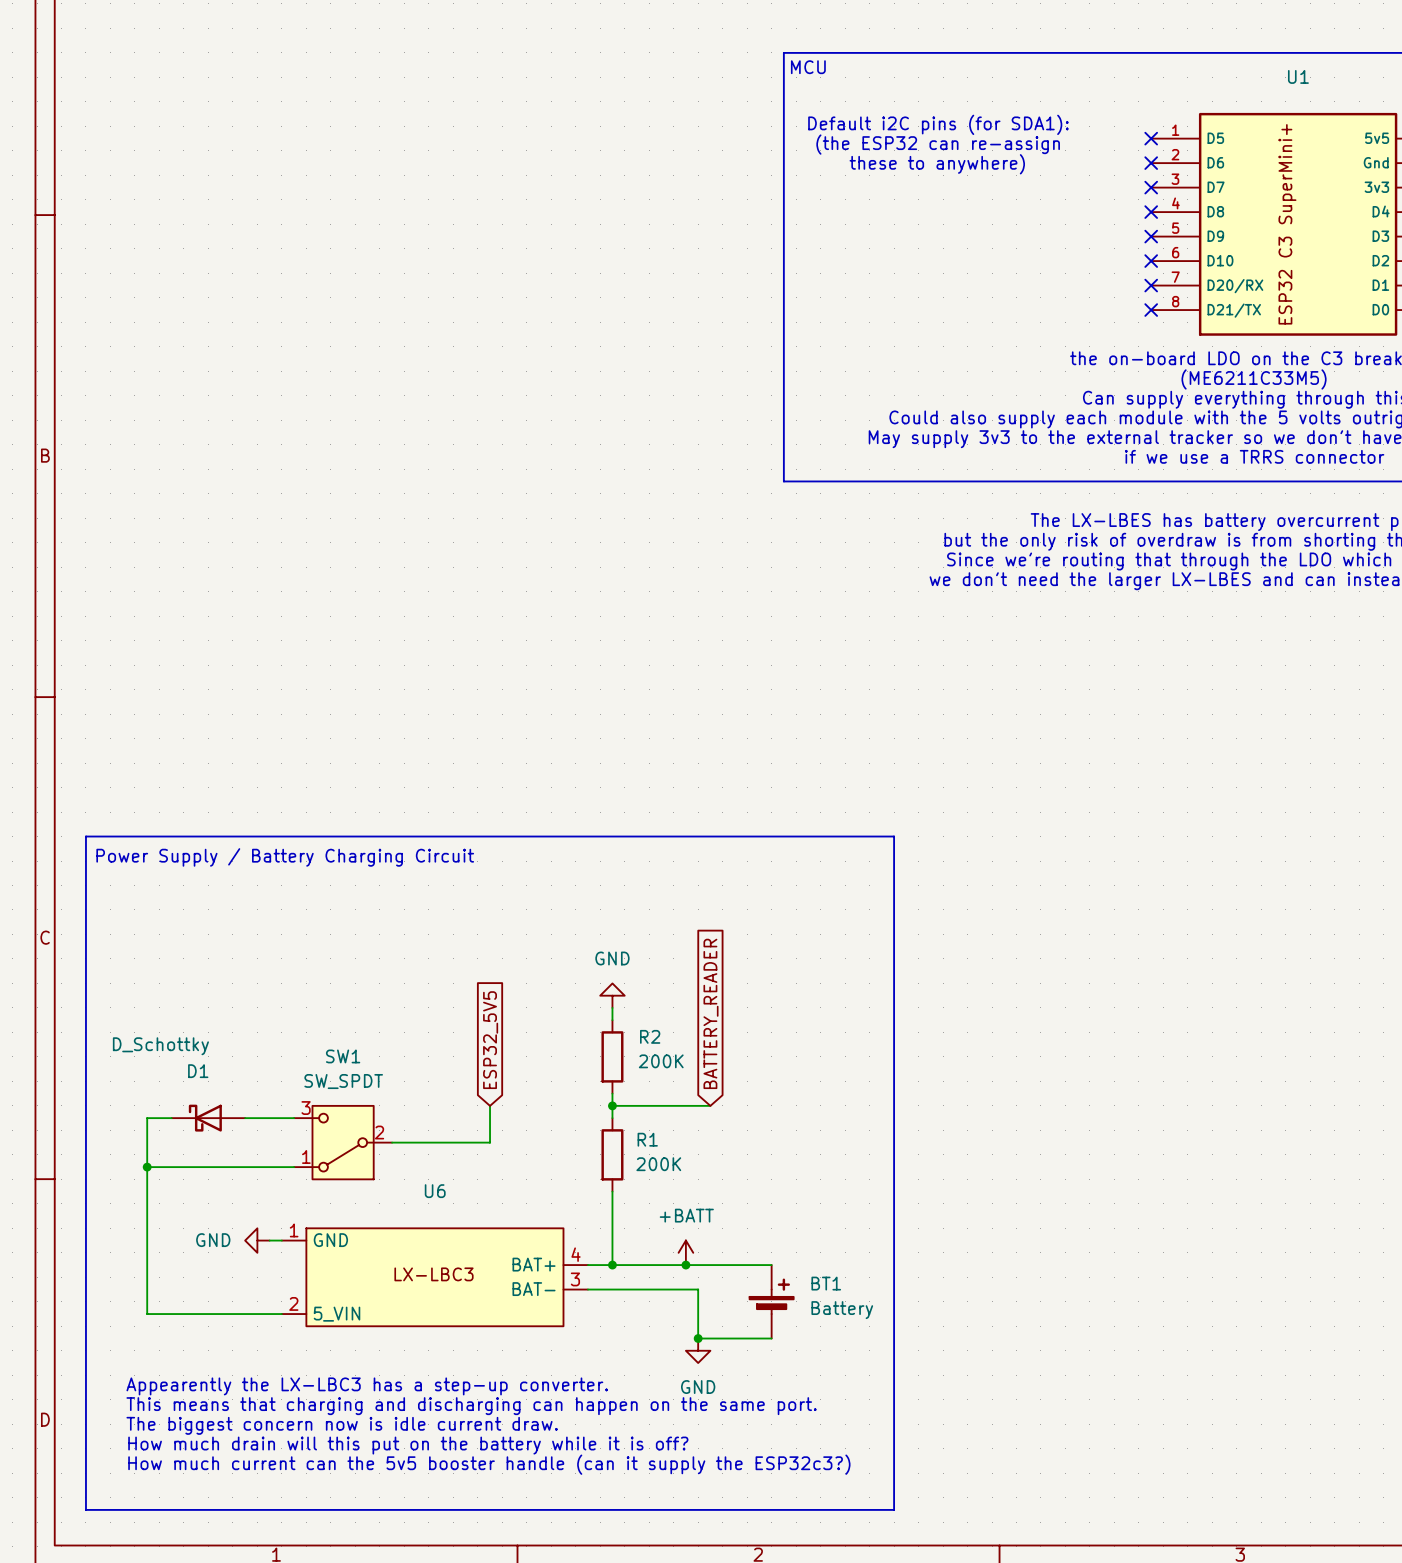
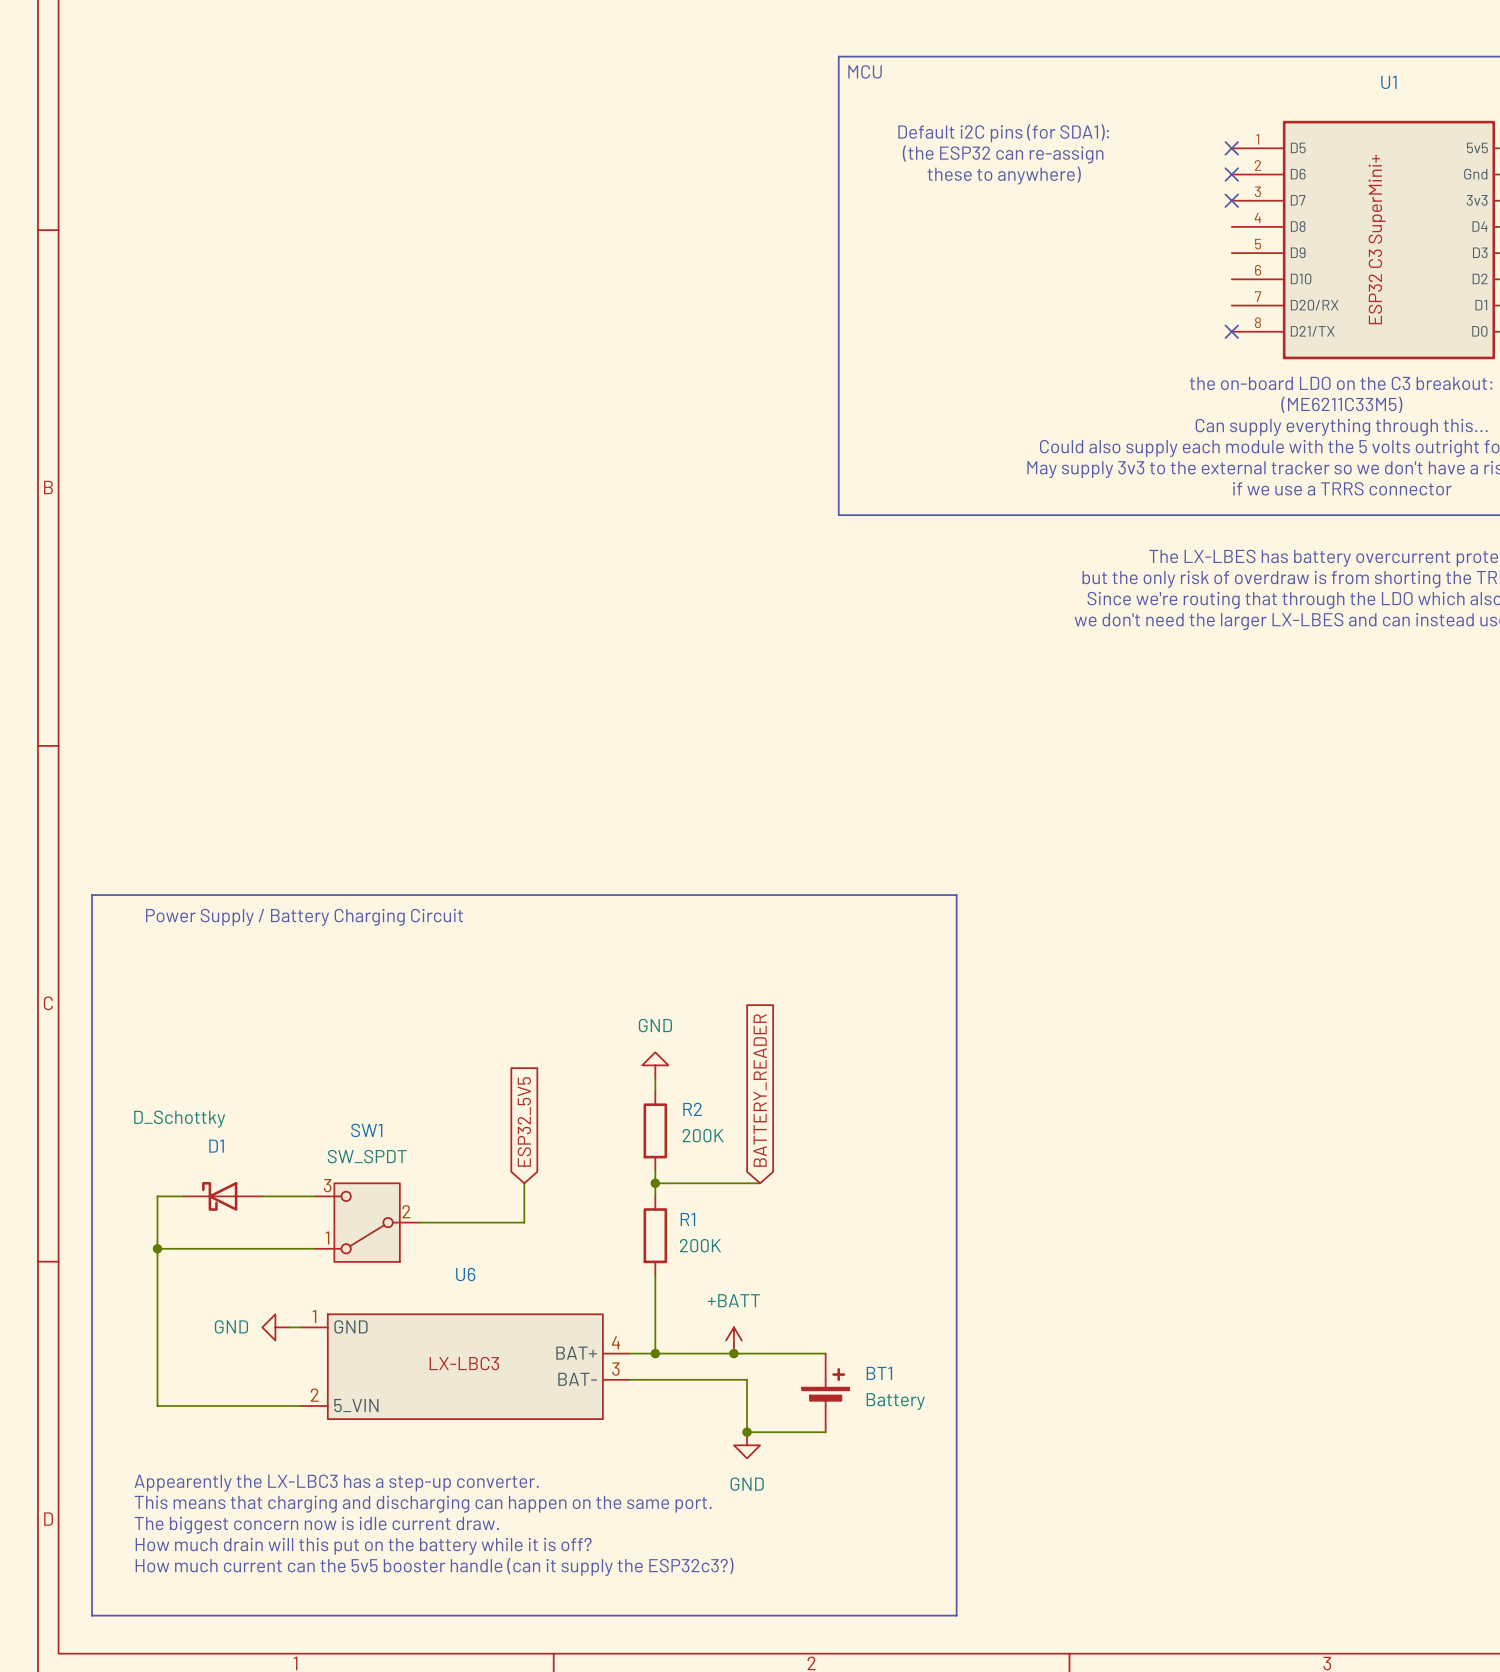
no-connect mark: (1151, 212) -> none
no-connect mark: (1151, 236) -> none
no-connect mark: (1151, 261) -> none
no-connect mark: (1151, 285) -> none

